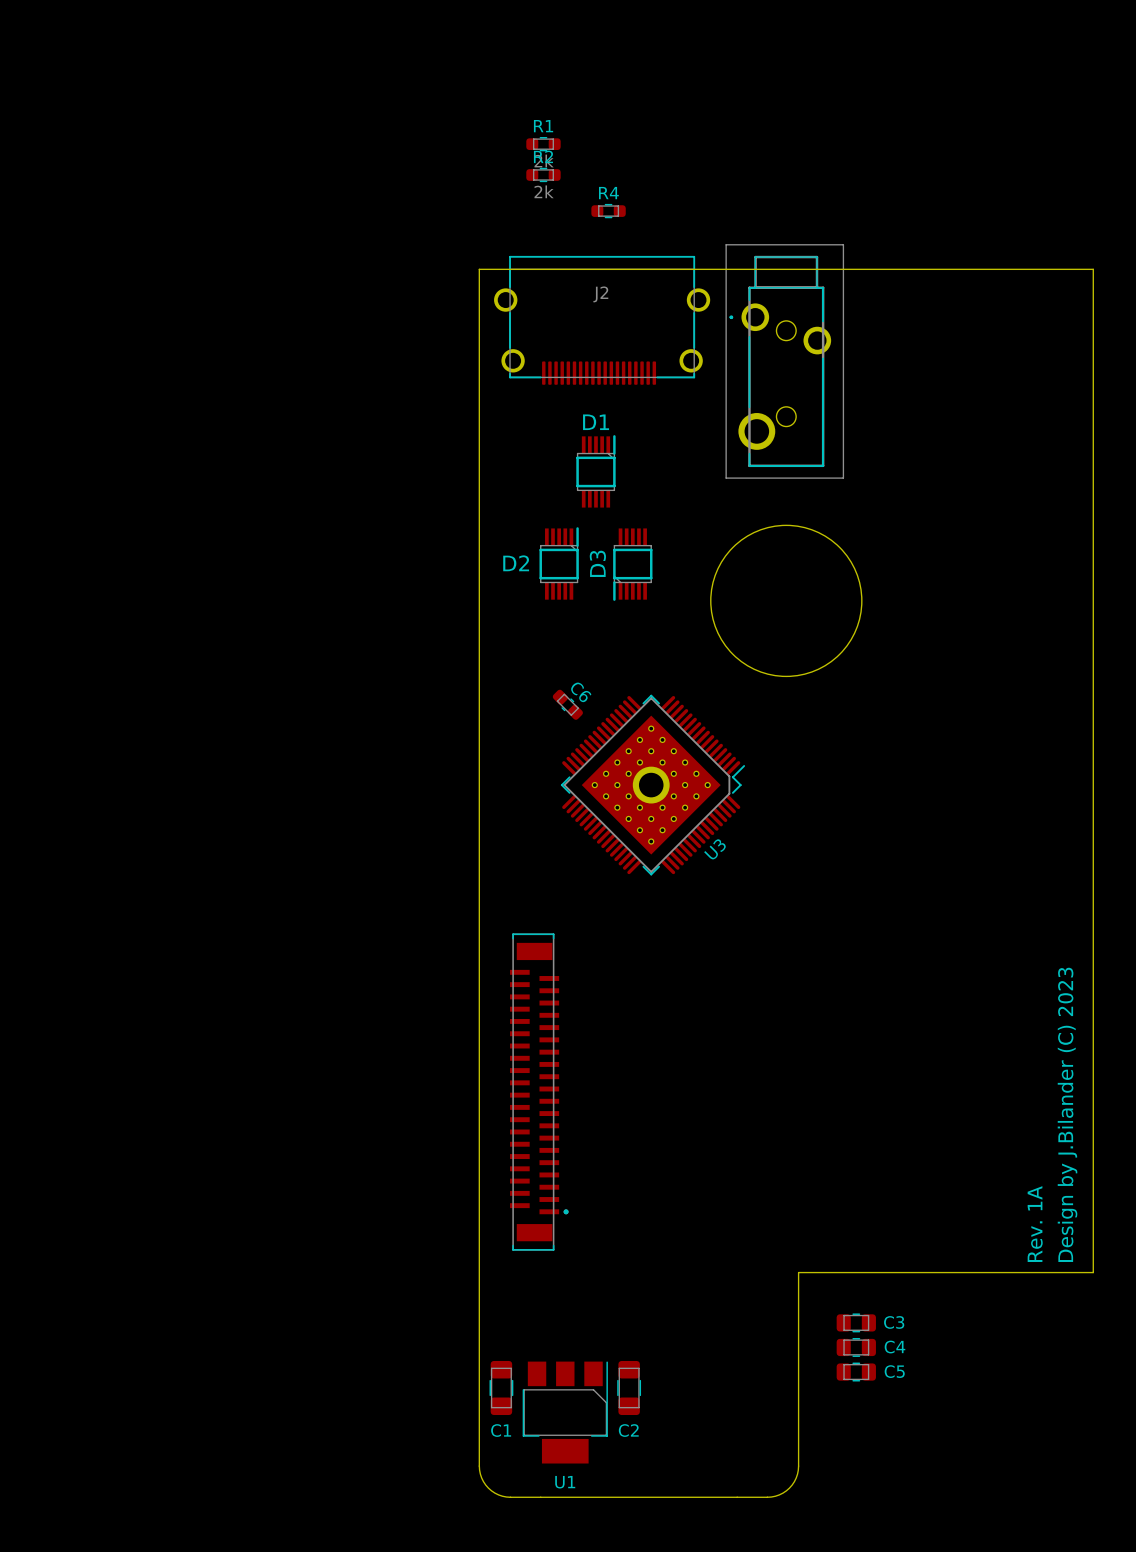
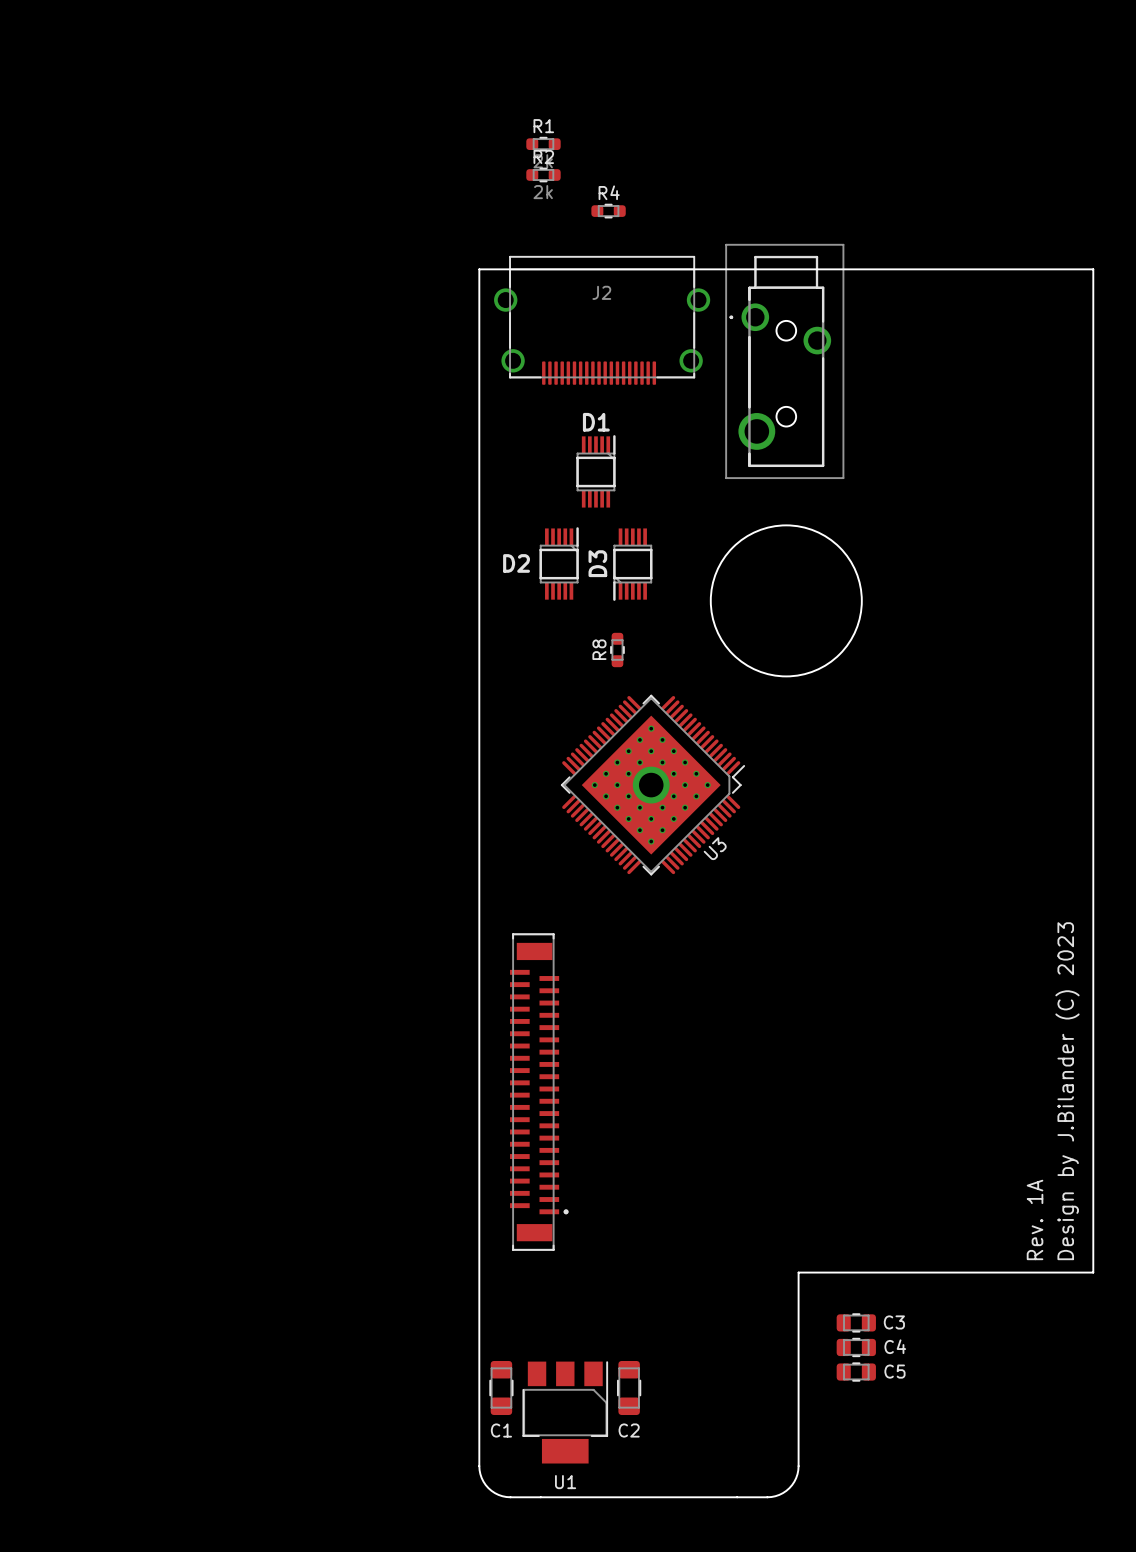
R8: none -> (617, 650)
C6: (567, 704) -> none

